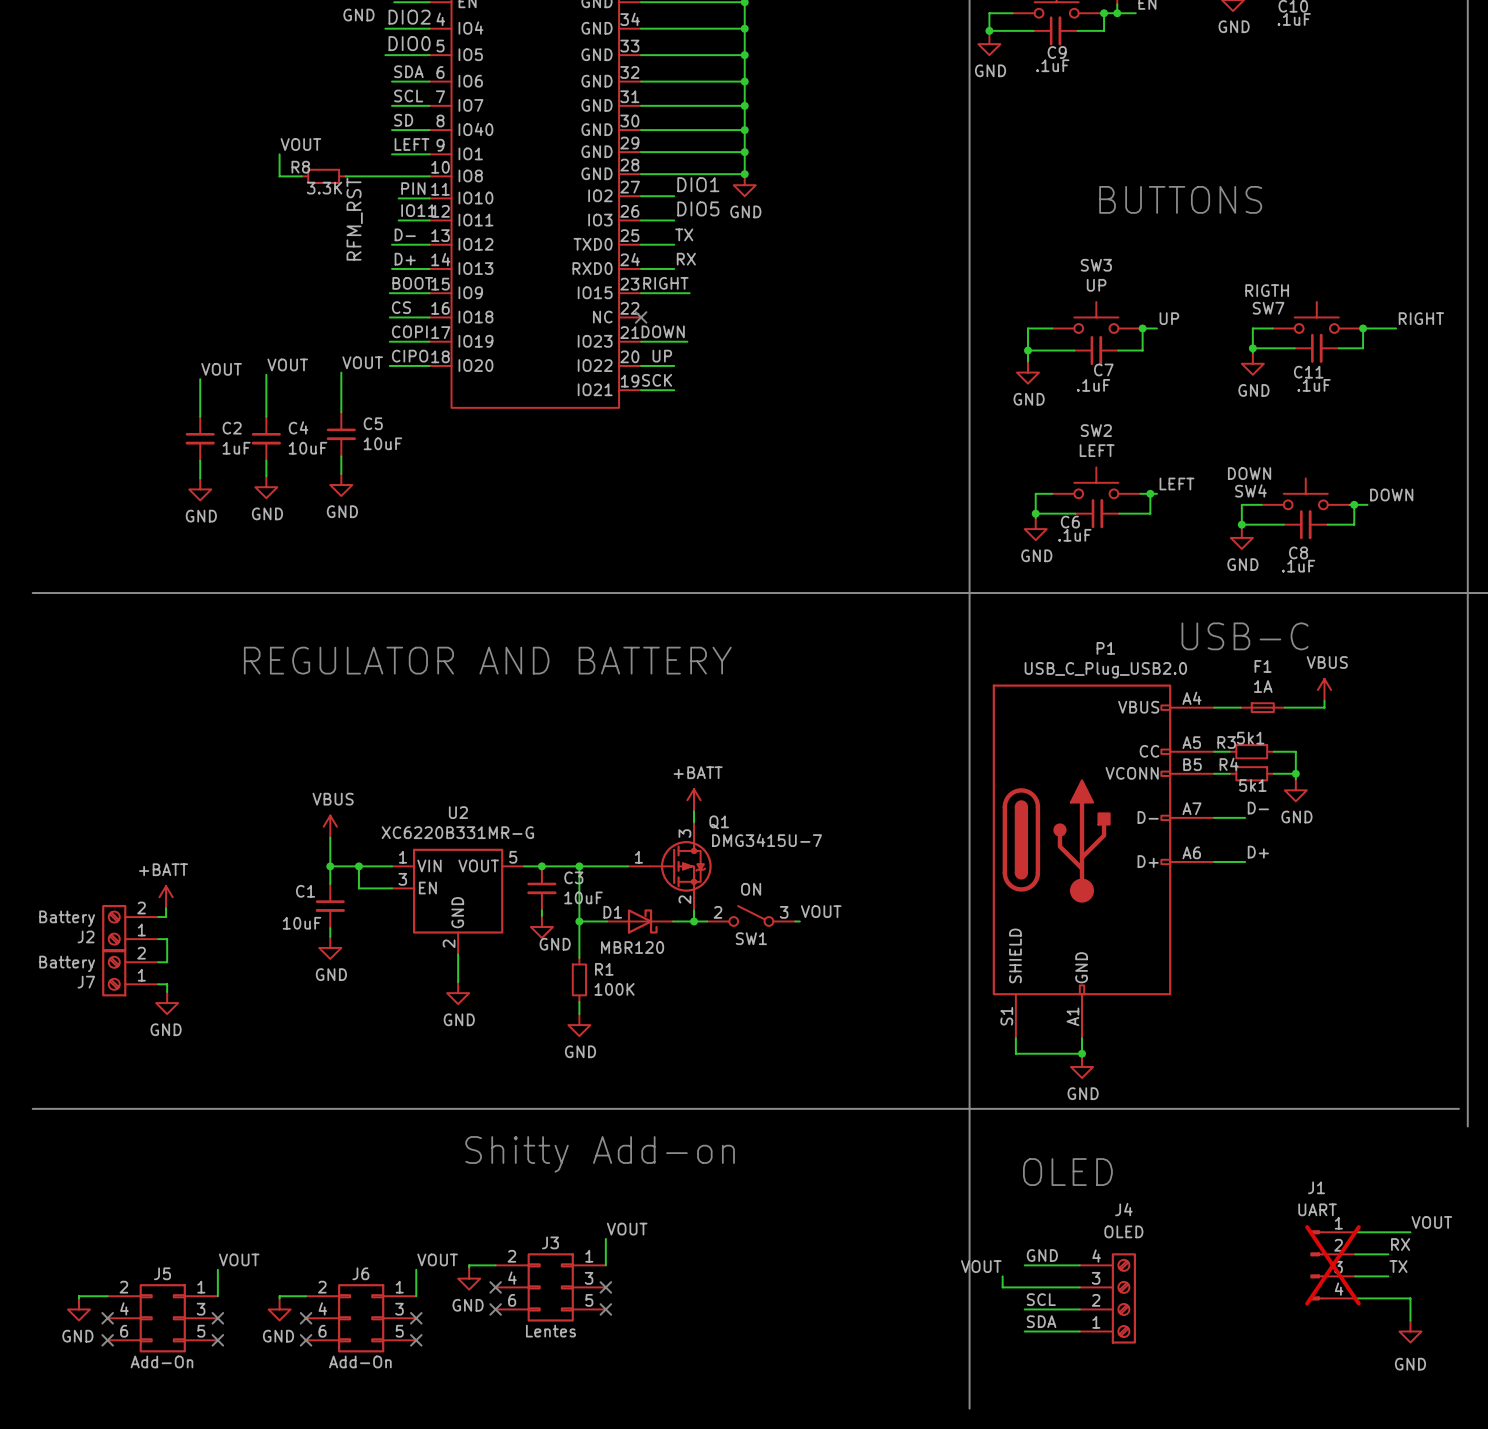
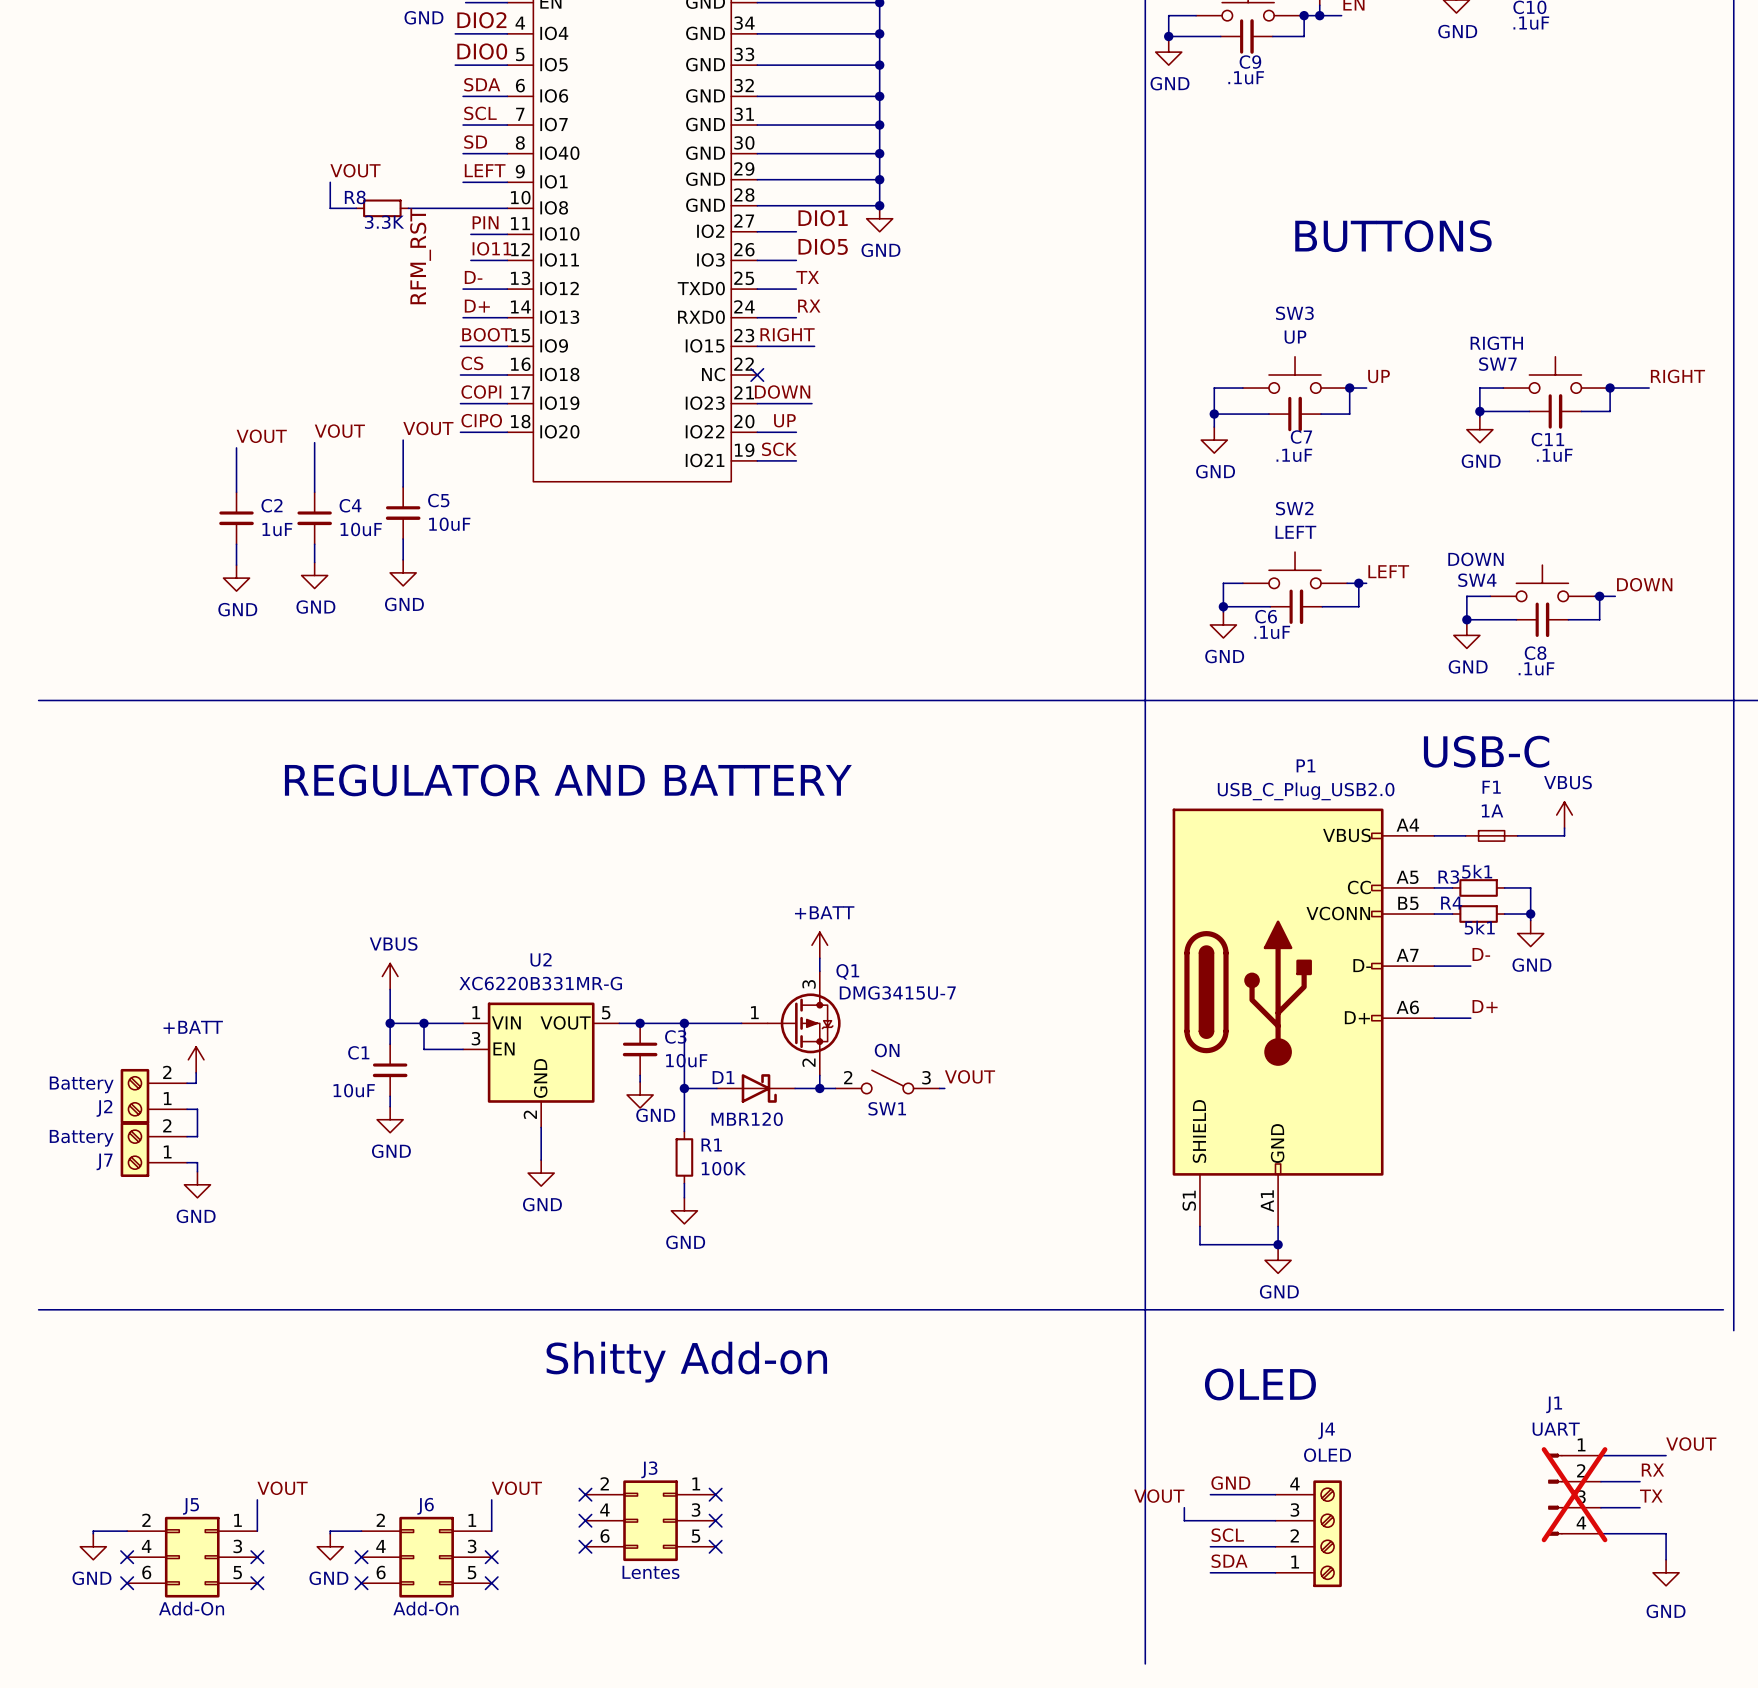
label: VOUT (627, 1229) -> none
wire: (605, 1238) (605, 1265) -> none
wire: (495, 1265) (469, 1265) (469, 1267) -> none
no-connect mark: none -> (585, 1494)
no-connect mark: none -> (715, 1494)
power symbol: GND (469, 1278) -> none

